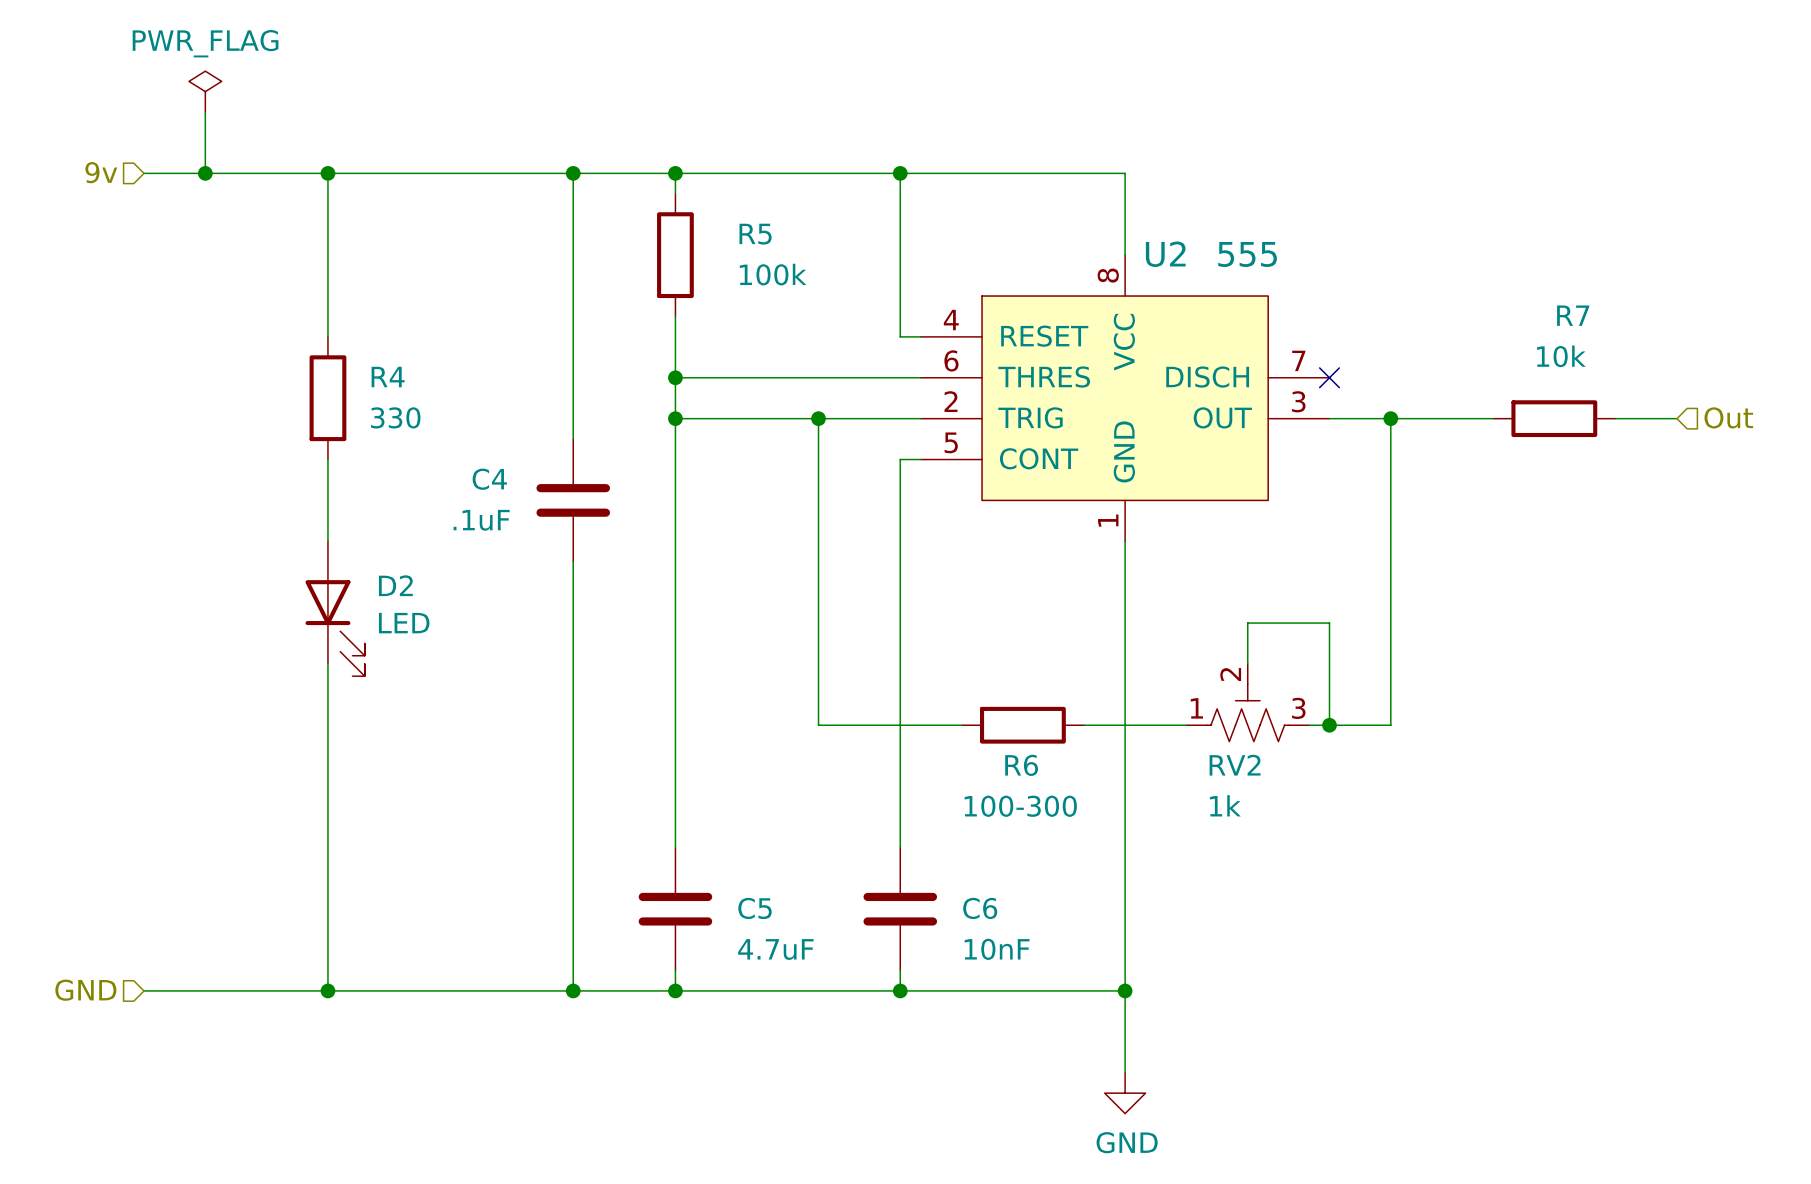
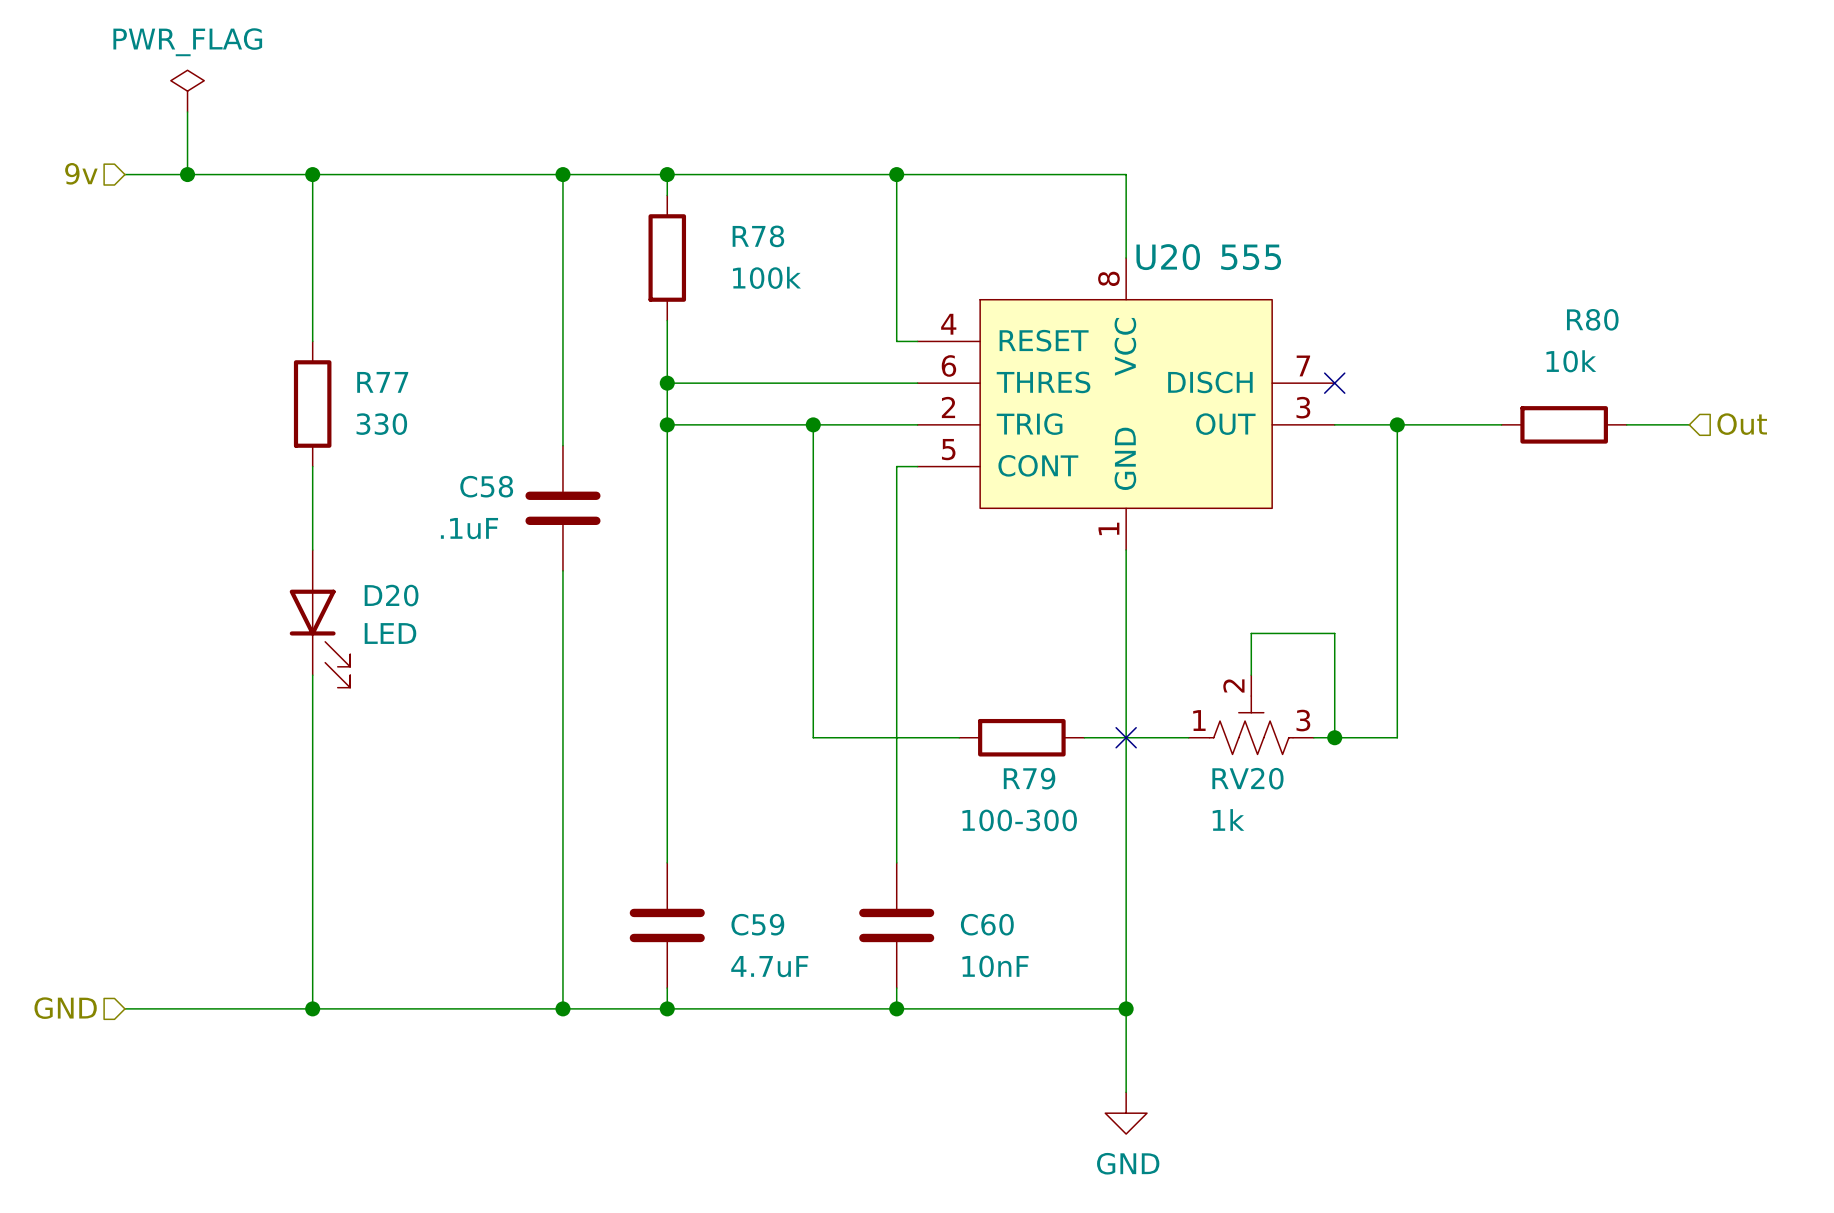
R5 name: R5 (755, 234) -> R78 (758, 236)
U2 name: U2 (1165, 254) -> U20 (1168, 257)
R7 name: R7 (1573, 315) -> R80 (1592, 319)
R4 name: R4 (388, 377) -> R77 (382, 382)
C4 name: C4 (489, 479) -> C58 (486, 486)
D2 name: D2 (395, 585) -> D20 (391, 595)
no-connect mark: none -> (1126, 737)
R6 name: R6 (1021, 765) -> R79 (1029, 778)
RV2 name: RV2 (1235, 765) -> RV20 (1247, 778)
C5 name: C5 (755, 908) -> C59 (757, 924)
C6 name: C6 (980, 908) -> C60 (987, 924)

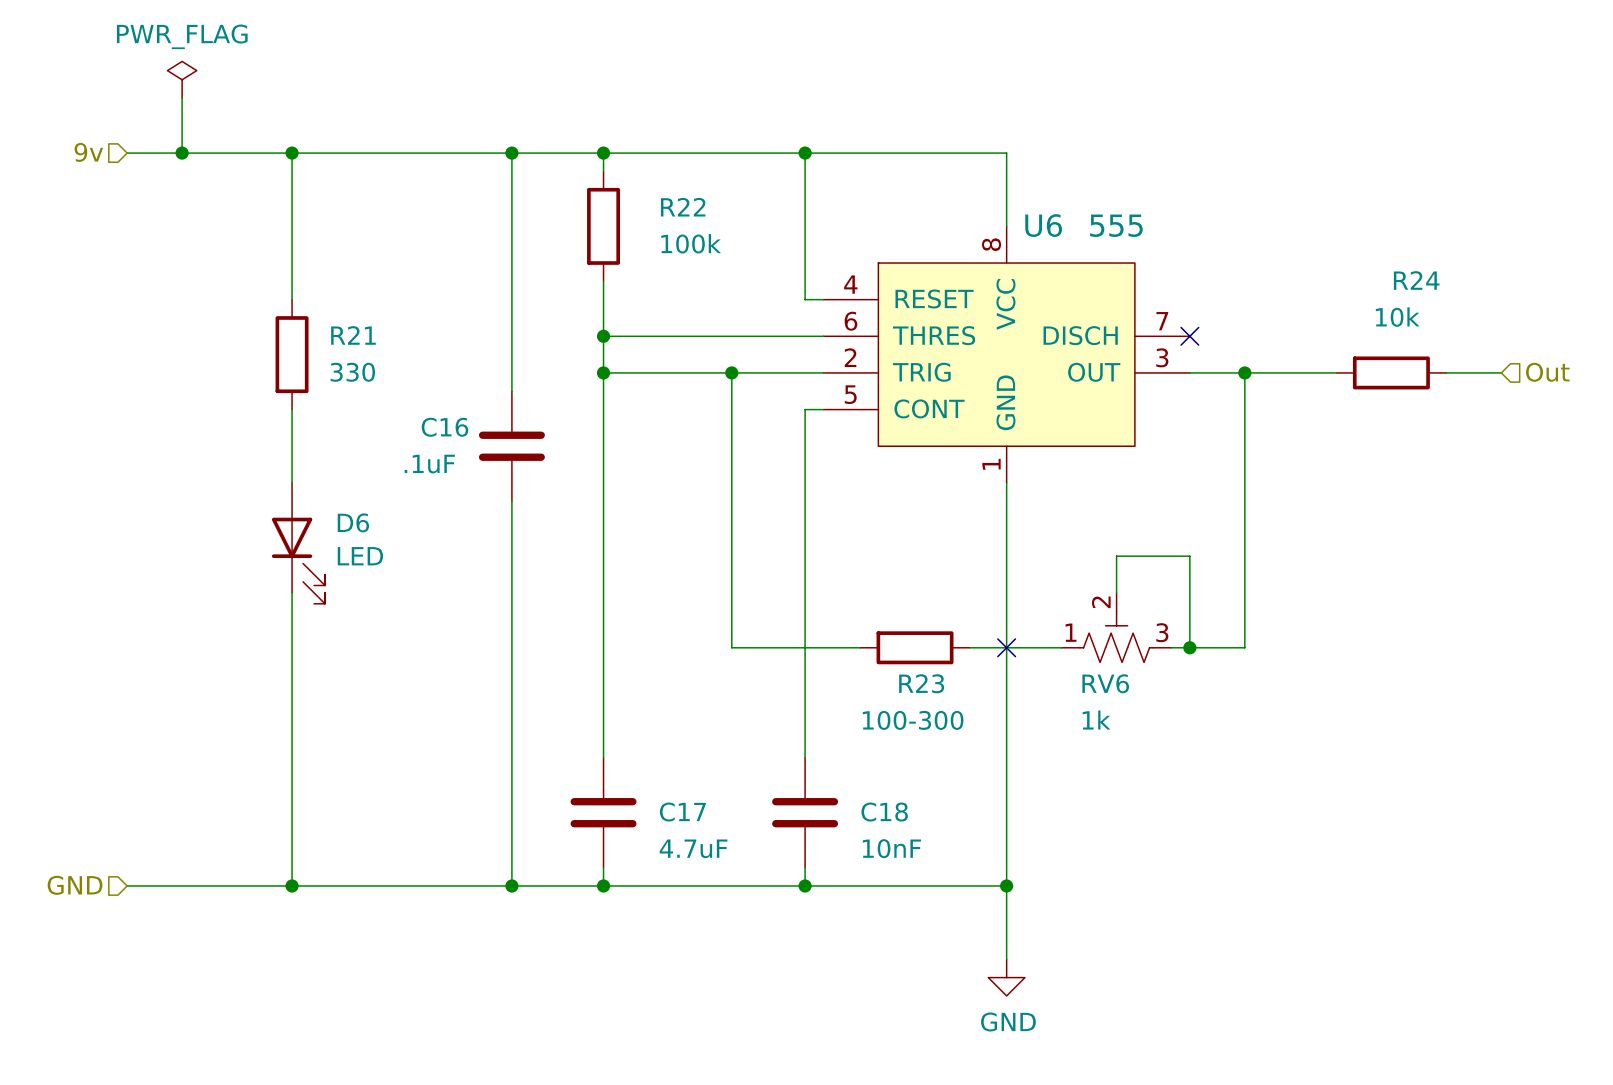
R78 name: R78 (758, 236) -> R22 (683, 207)
U20 name: U20 (1168, 257) -> U6 (1043, 225)
R80 name: R80 (1592, 319) -> R24 (1416, 280)
R77 name: R77 (382, 382) -> R21 (353, 335)
C58 name: C58 (486, 486) -> C16 (444, 427)
D20 name: D20 (391, 595) -> D6 (353, 522)
R79 name: R79 (1029, 778) -> R23 (921, 683)
RV20 name: RV20 (1247, 778) -> RV6 (1105, 683)
C59 name: C59 (757, 924) -> C17 (682, 812)
C60 name: C60 (987, 924) -> C18 (884, 812)

